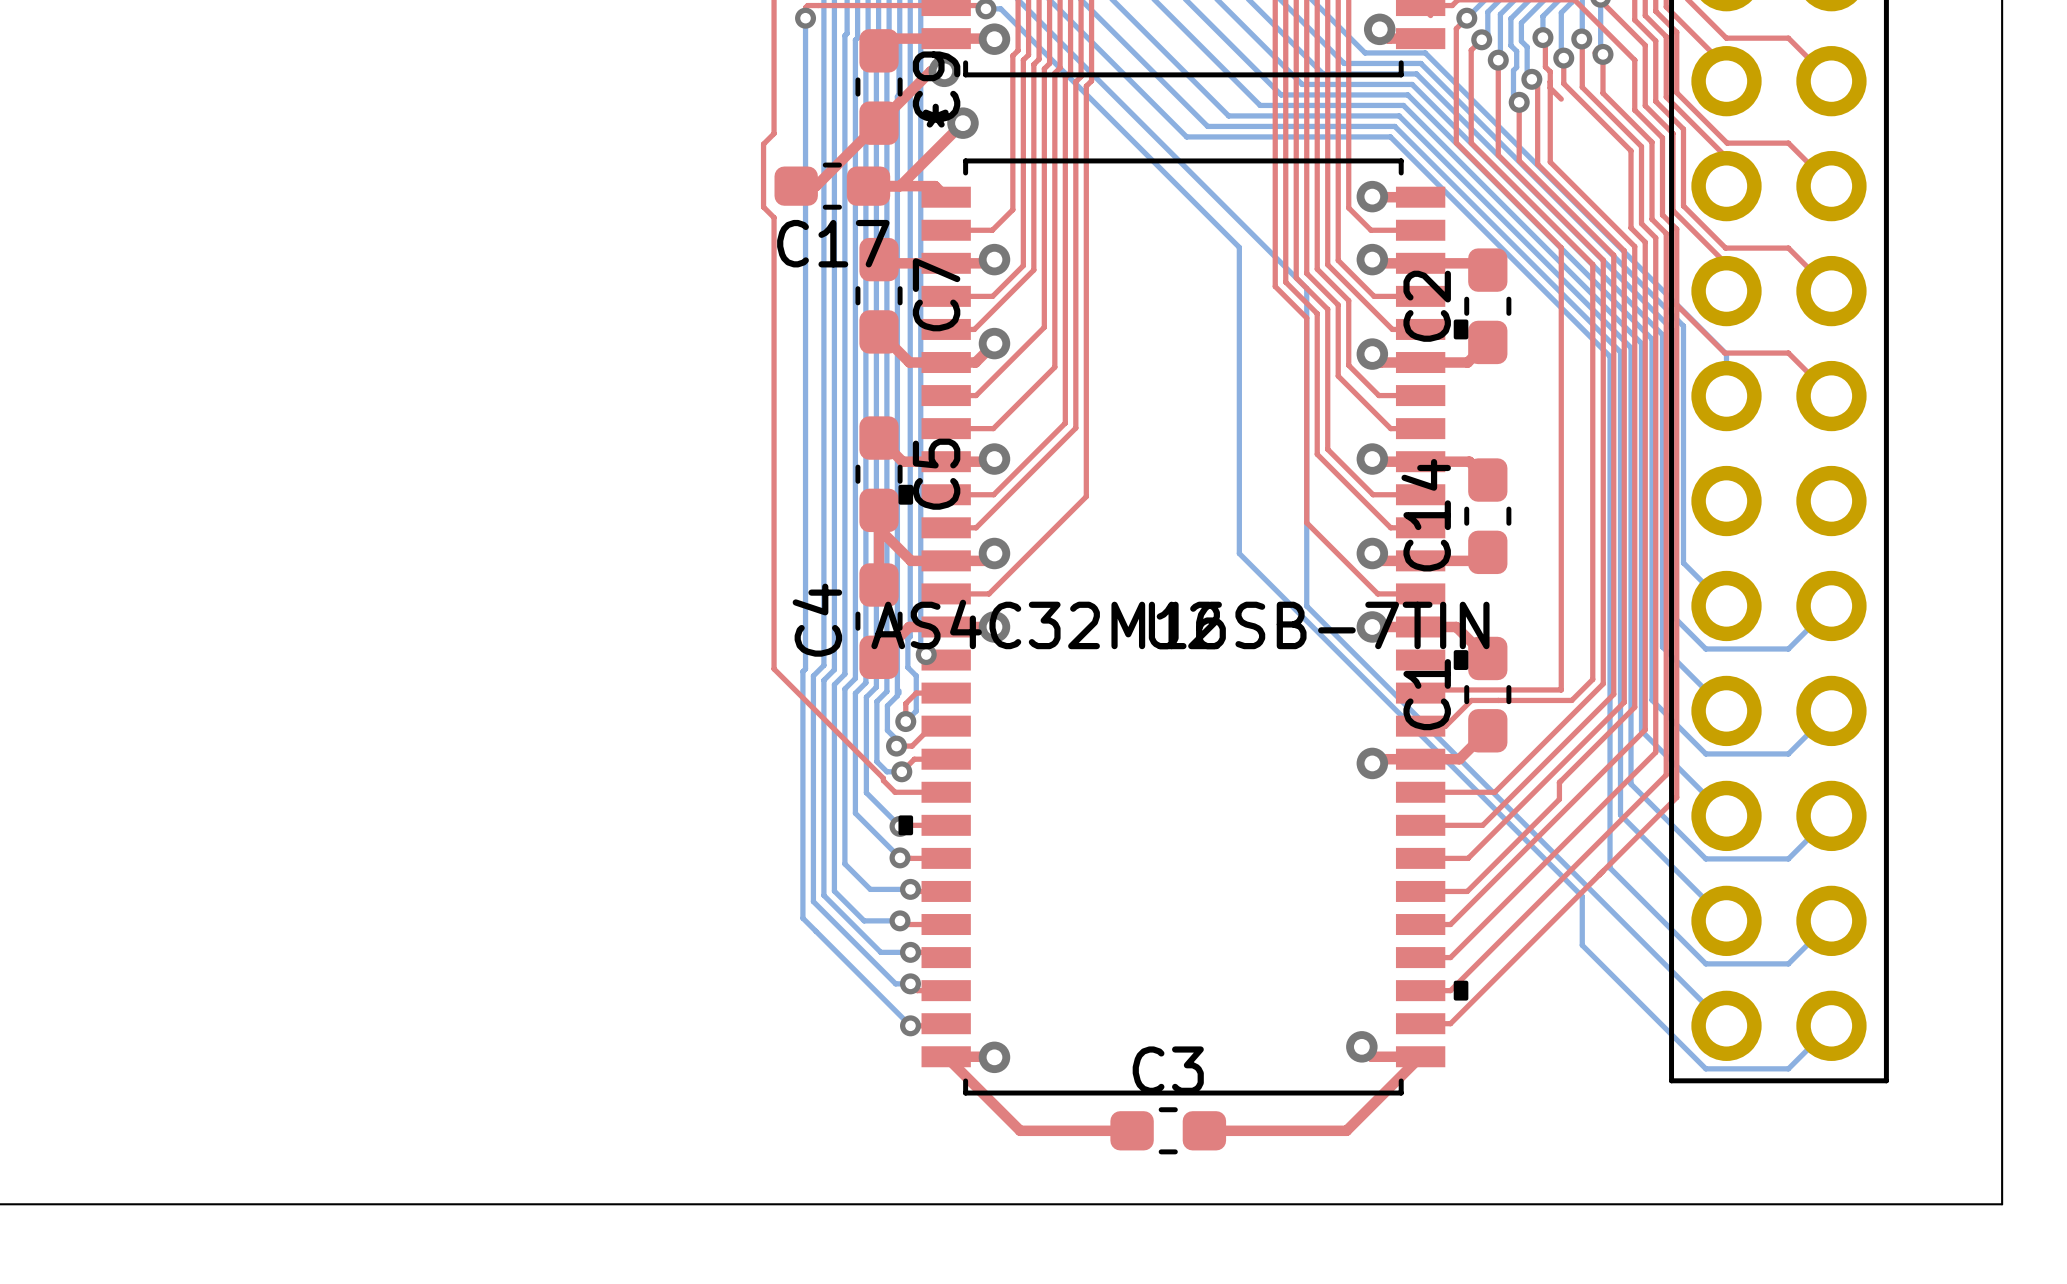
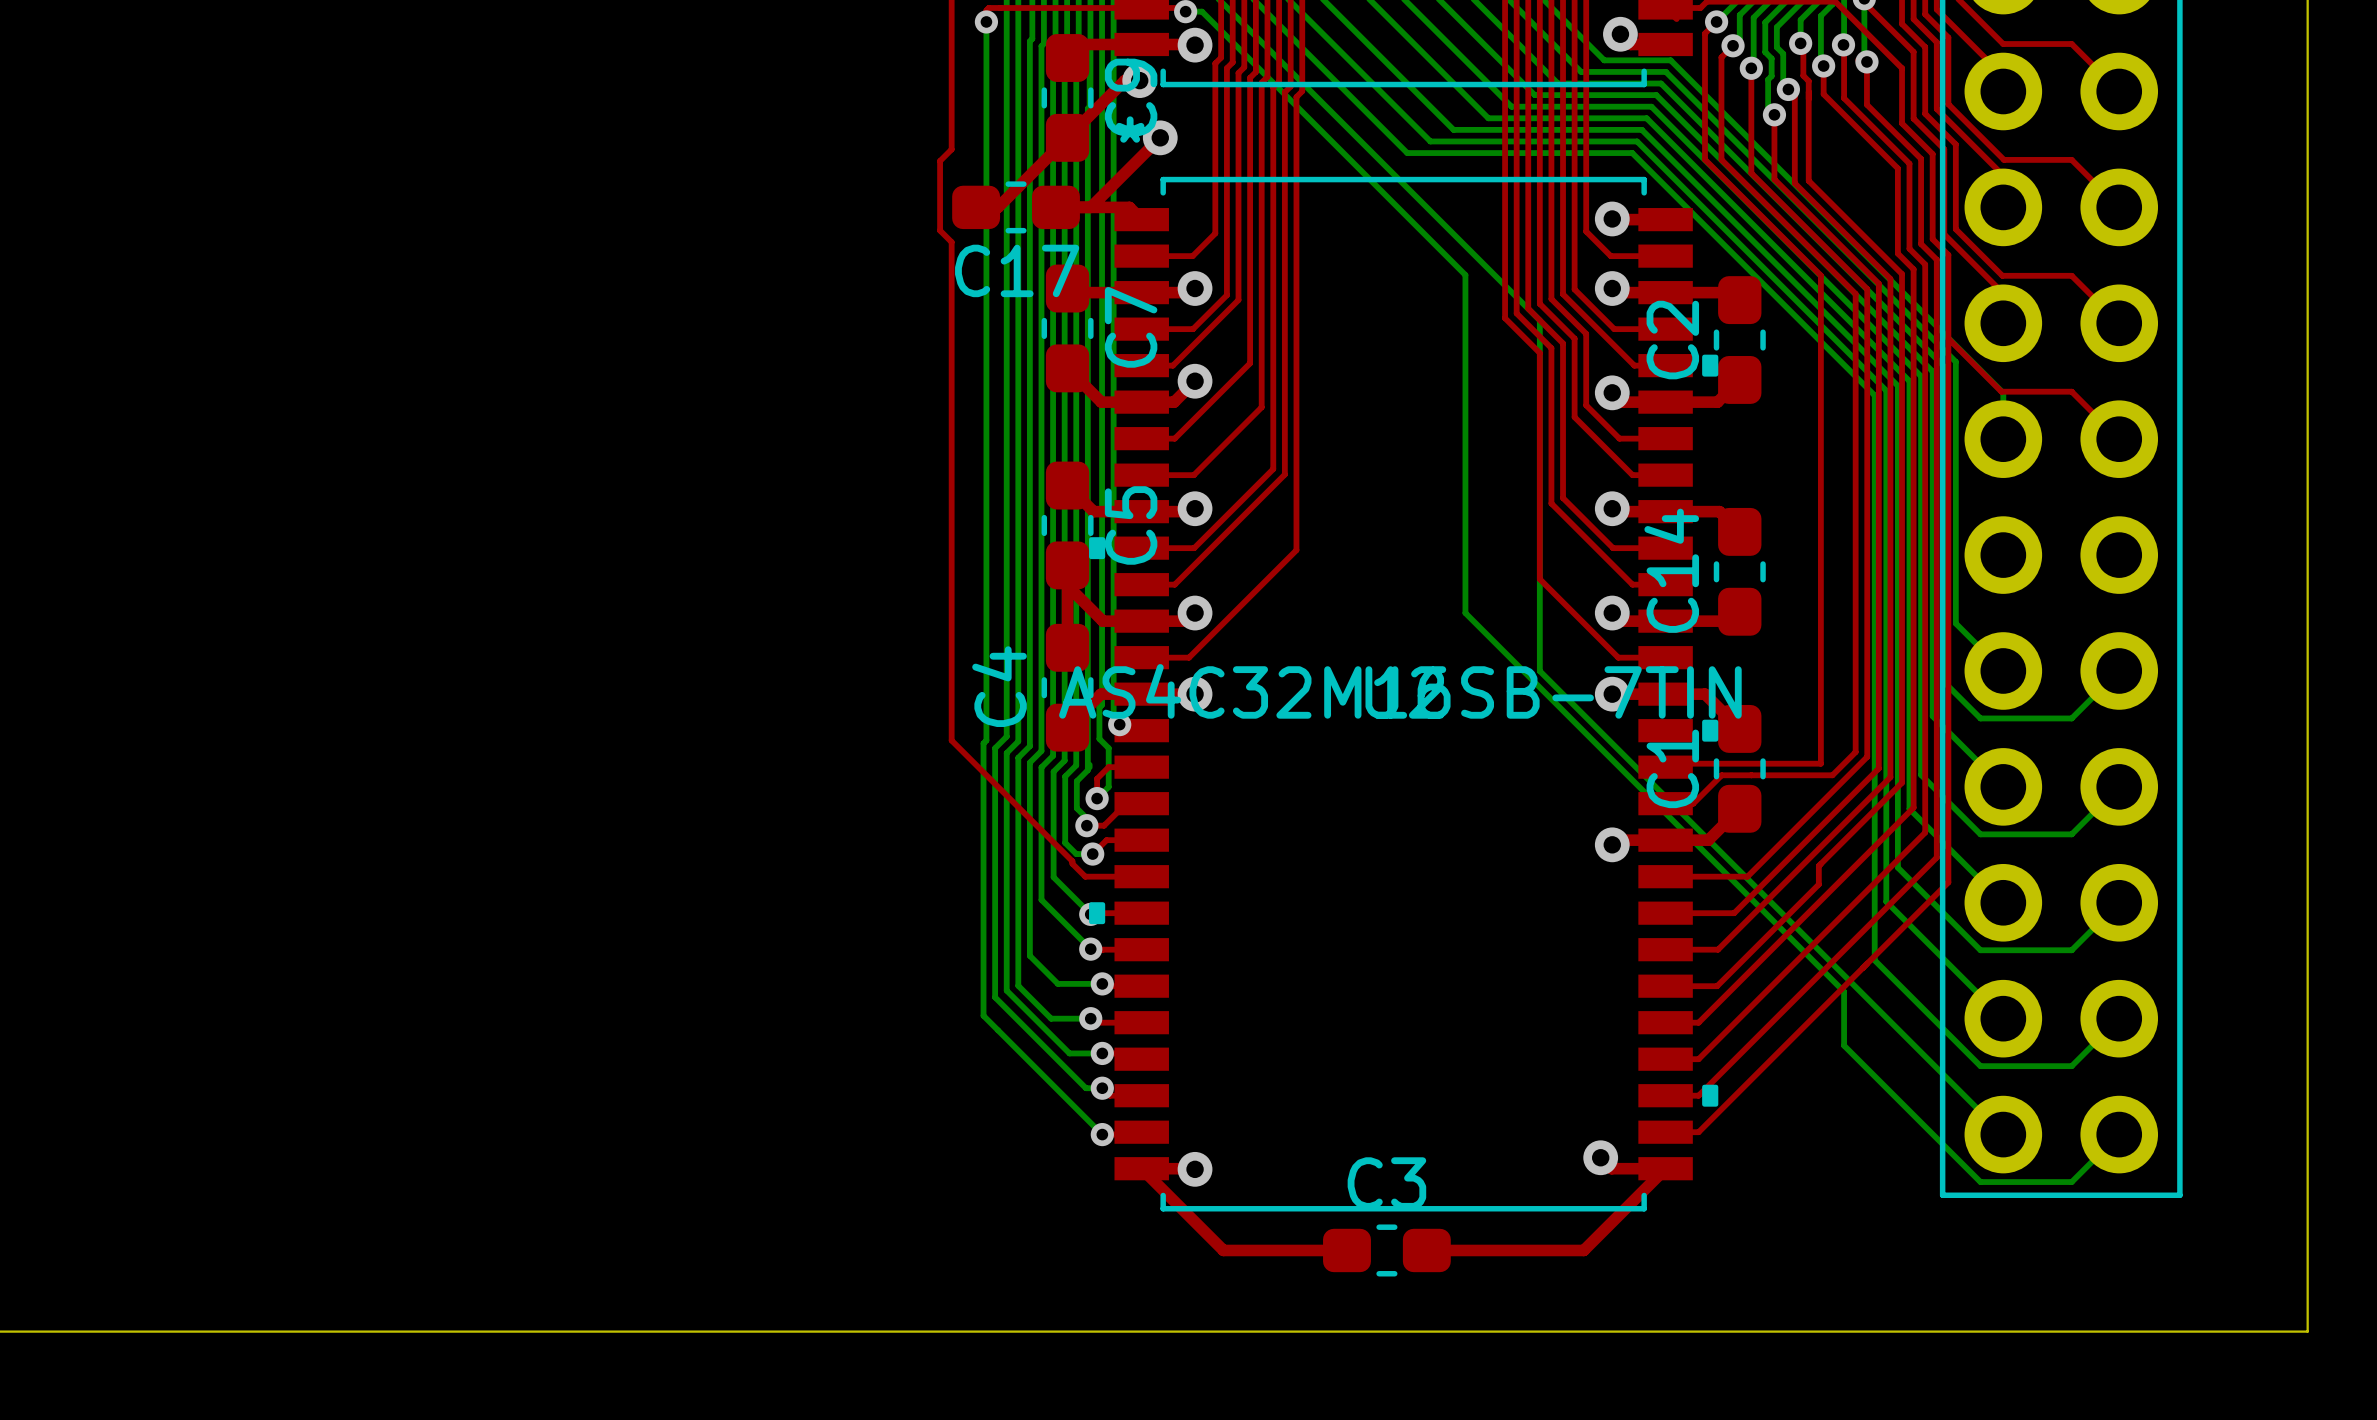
top track: (1550, 88) (1561, 99) -> none

